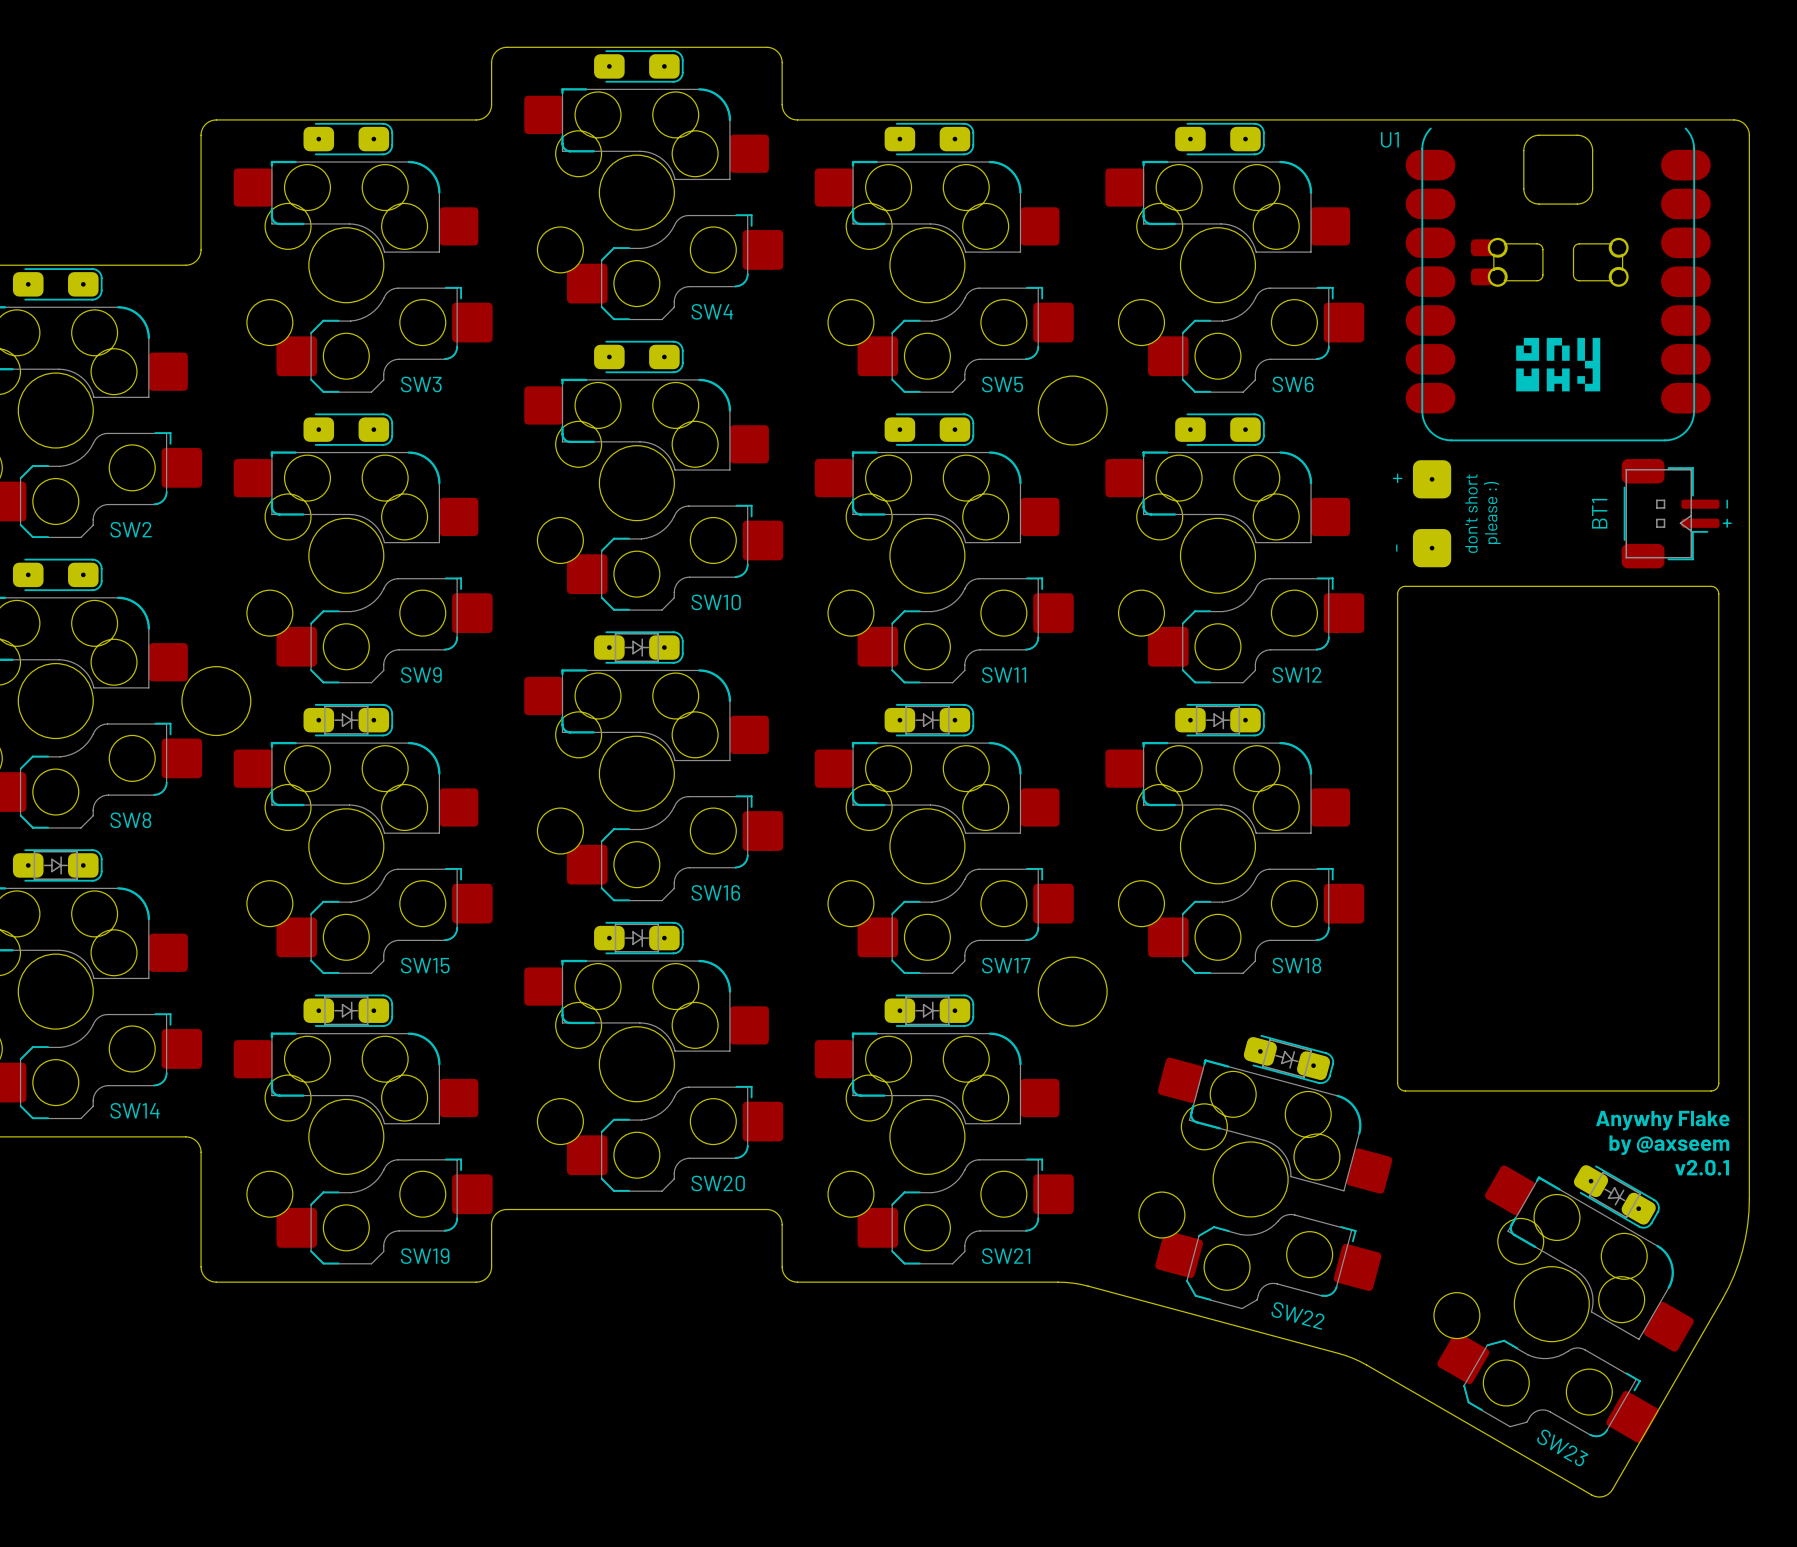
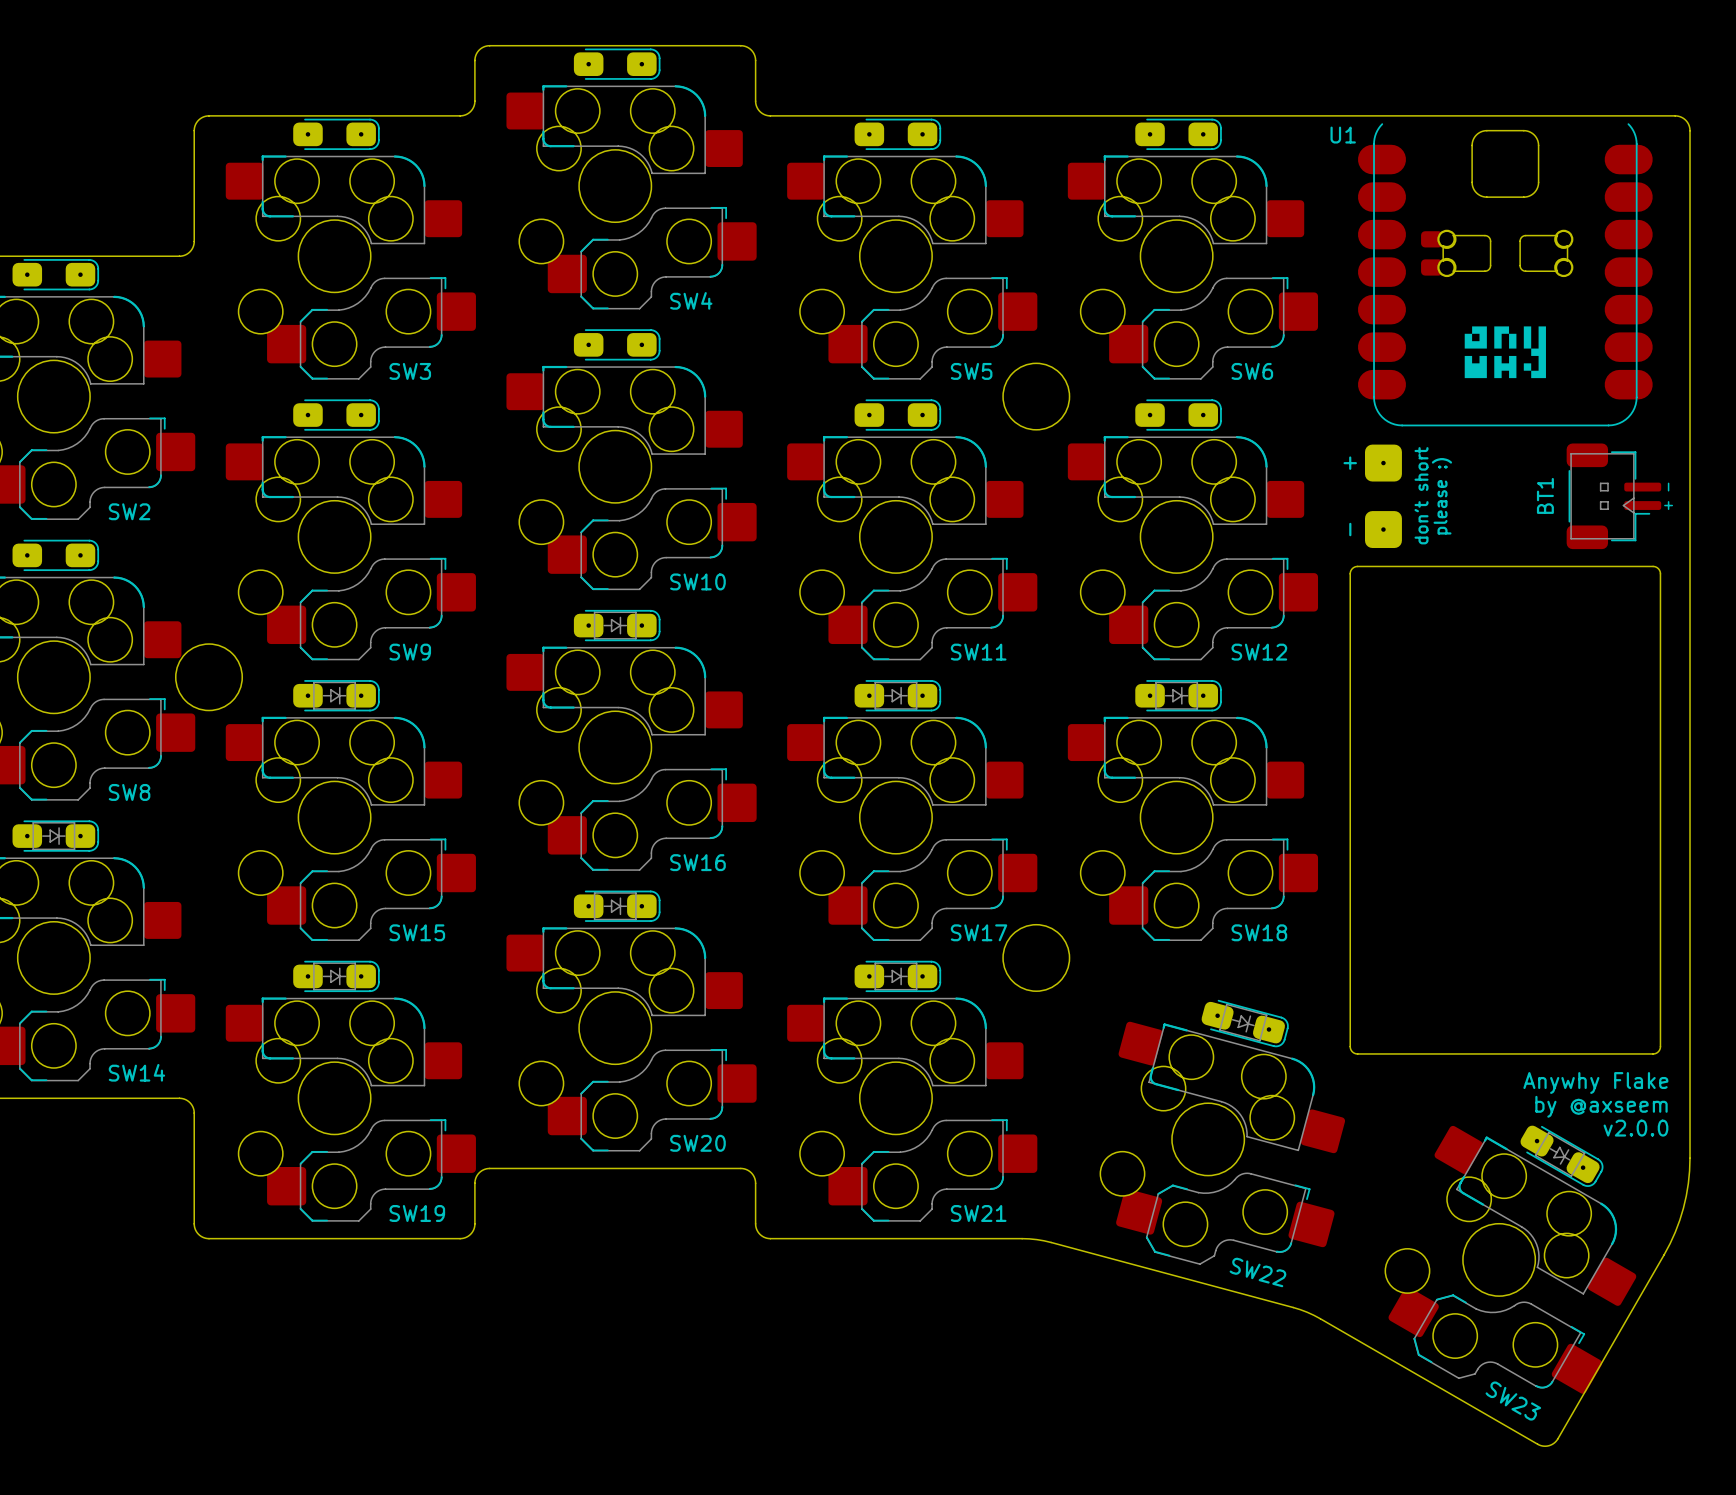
text: v2.0.1 (1702, 1167) -> v2.0.0 (1635, 1128)

